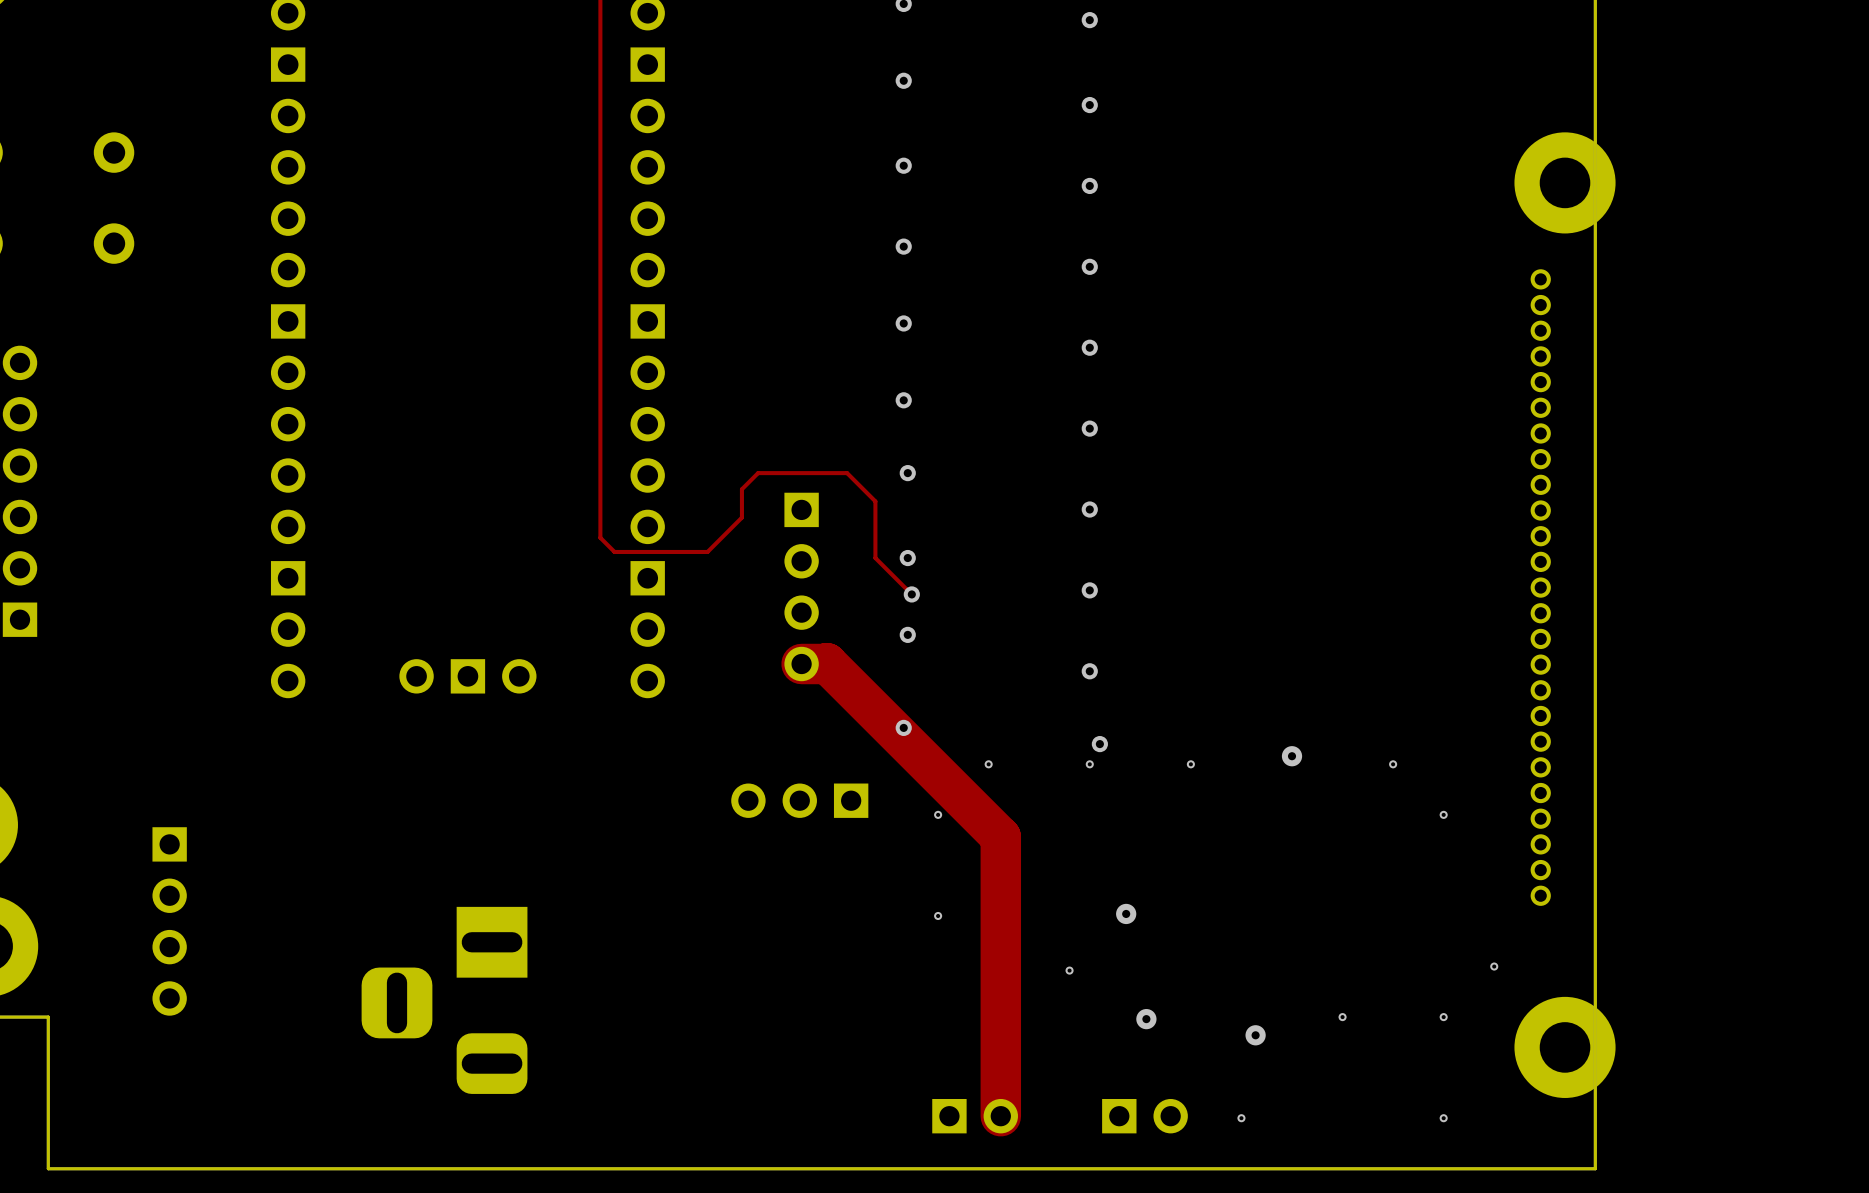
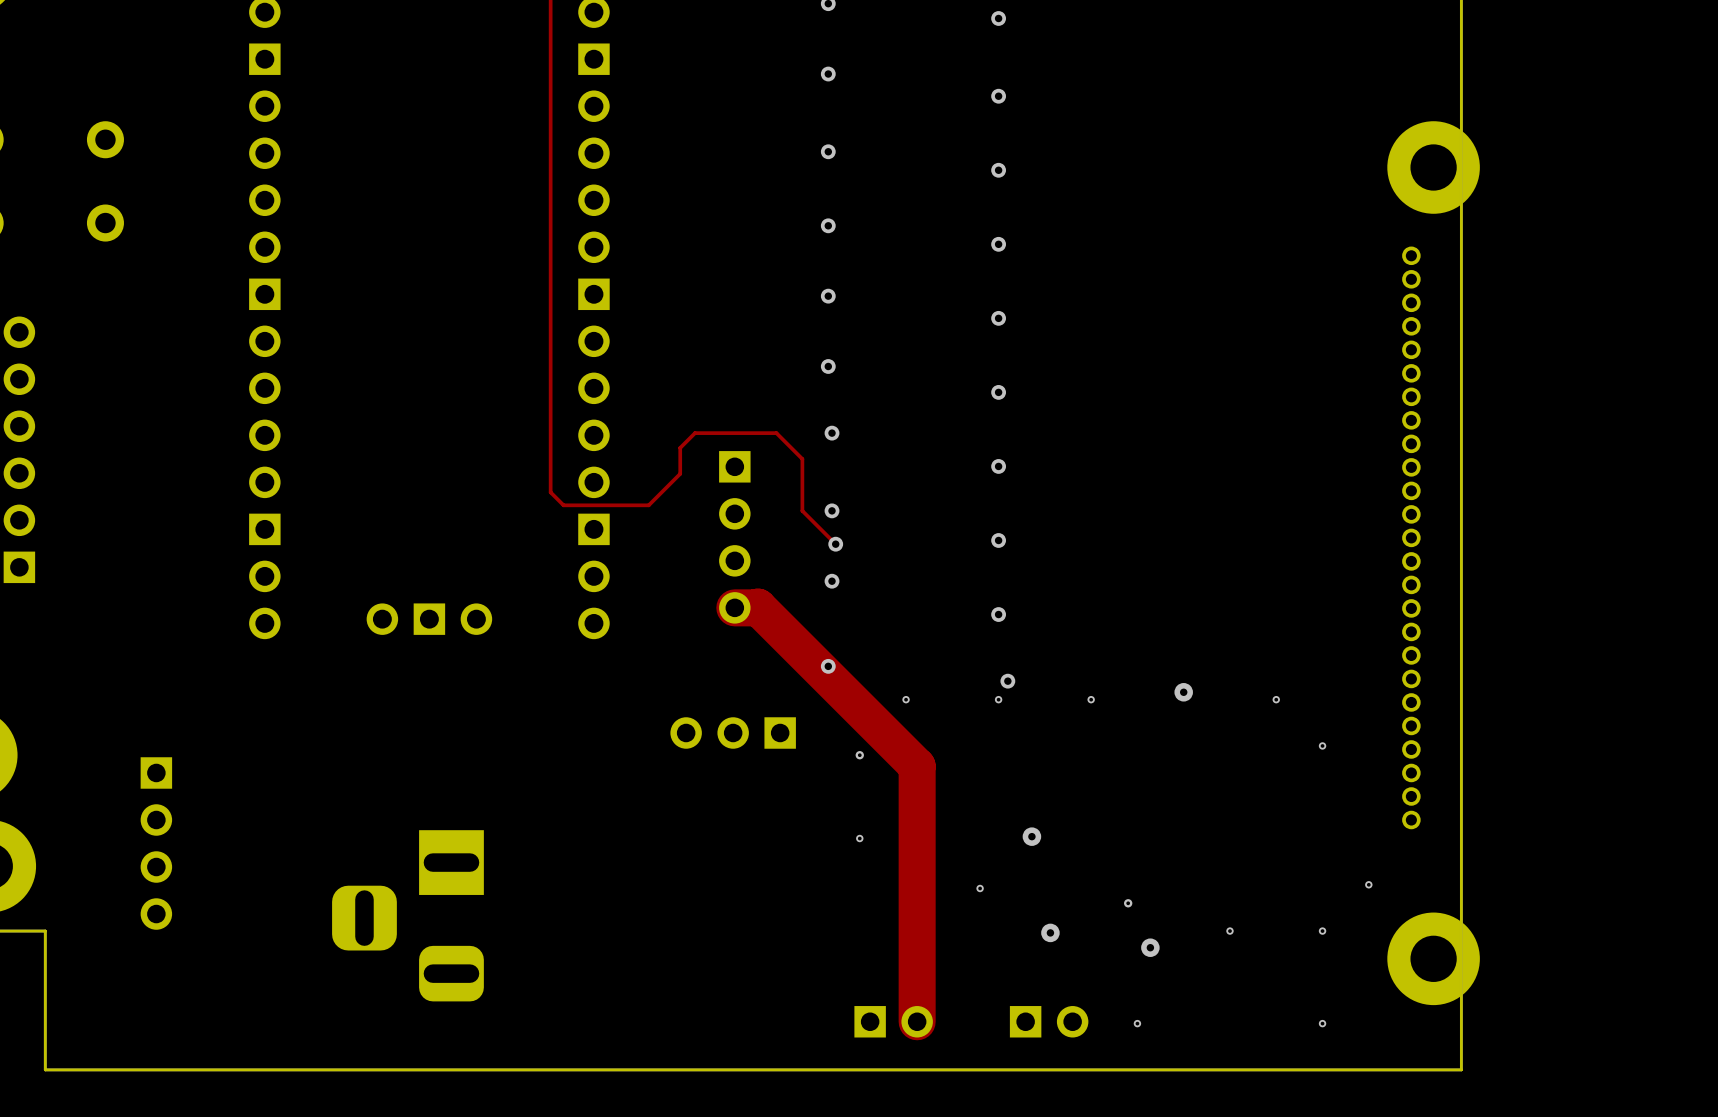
via: (938, 814) -> none
via: none -> (859, 755)
via: none -> (1128, 903)

